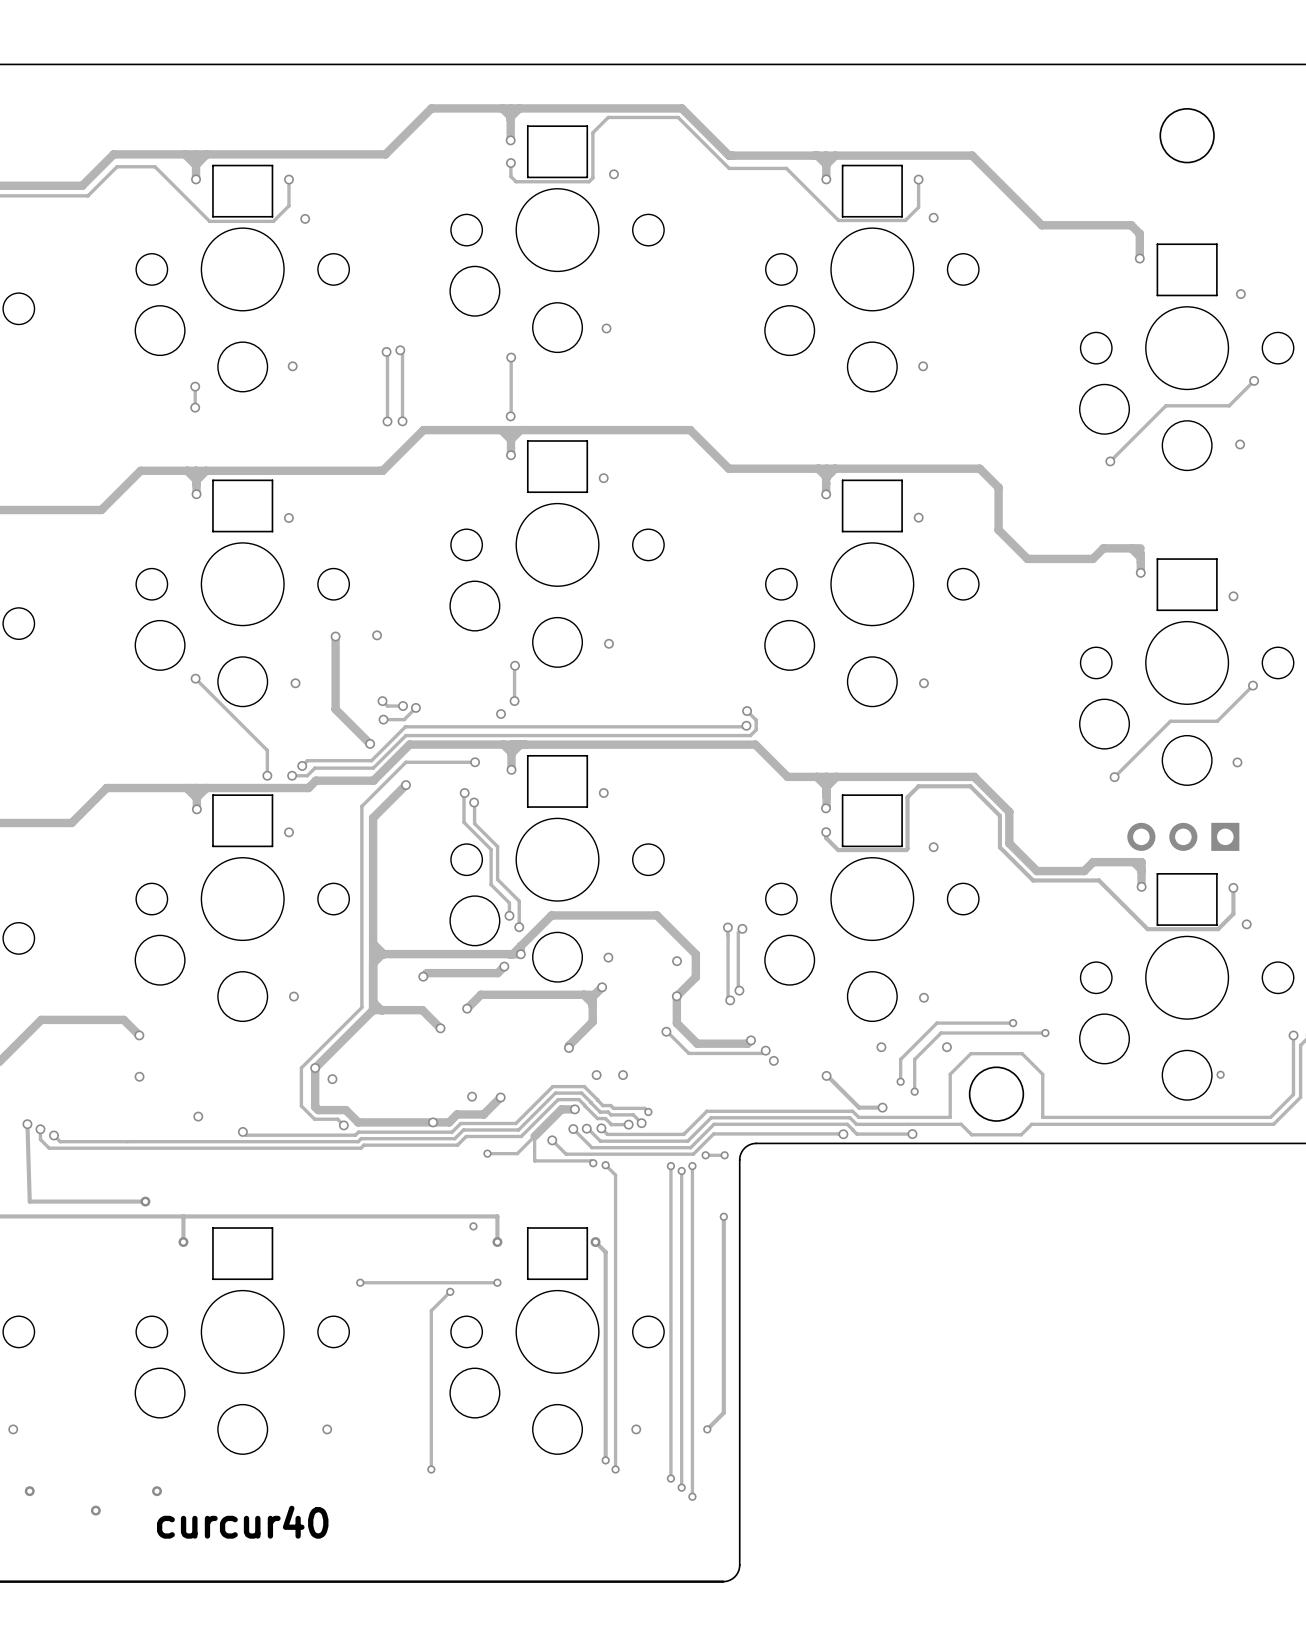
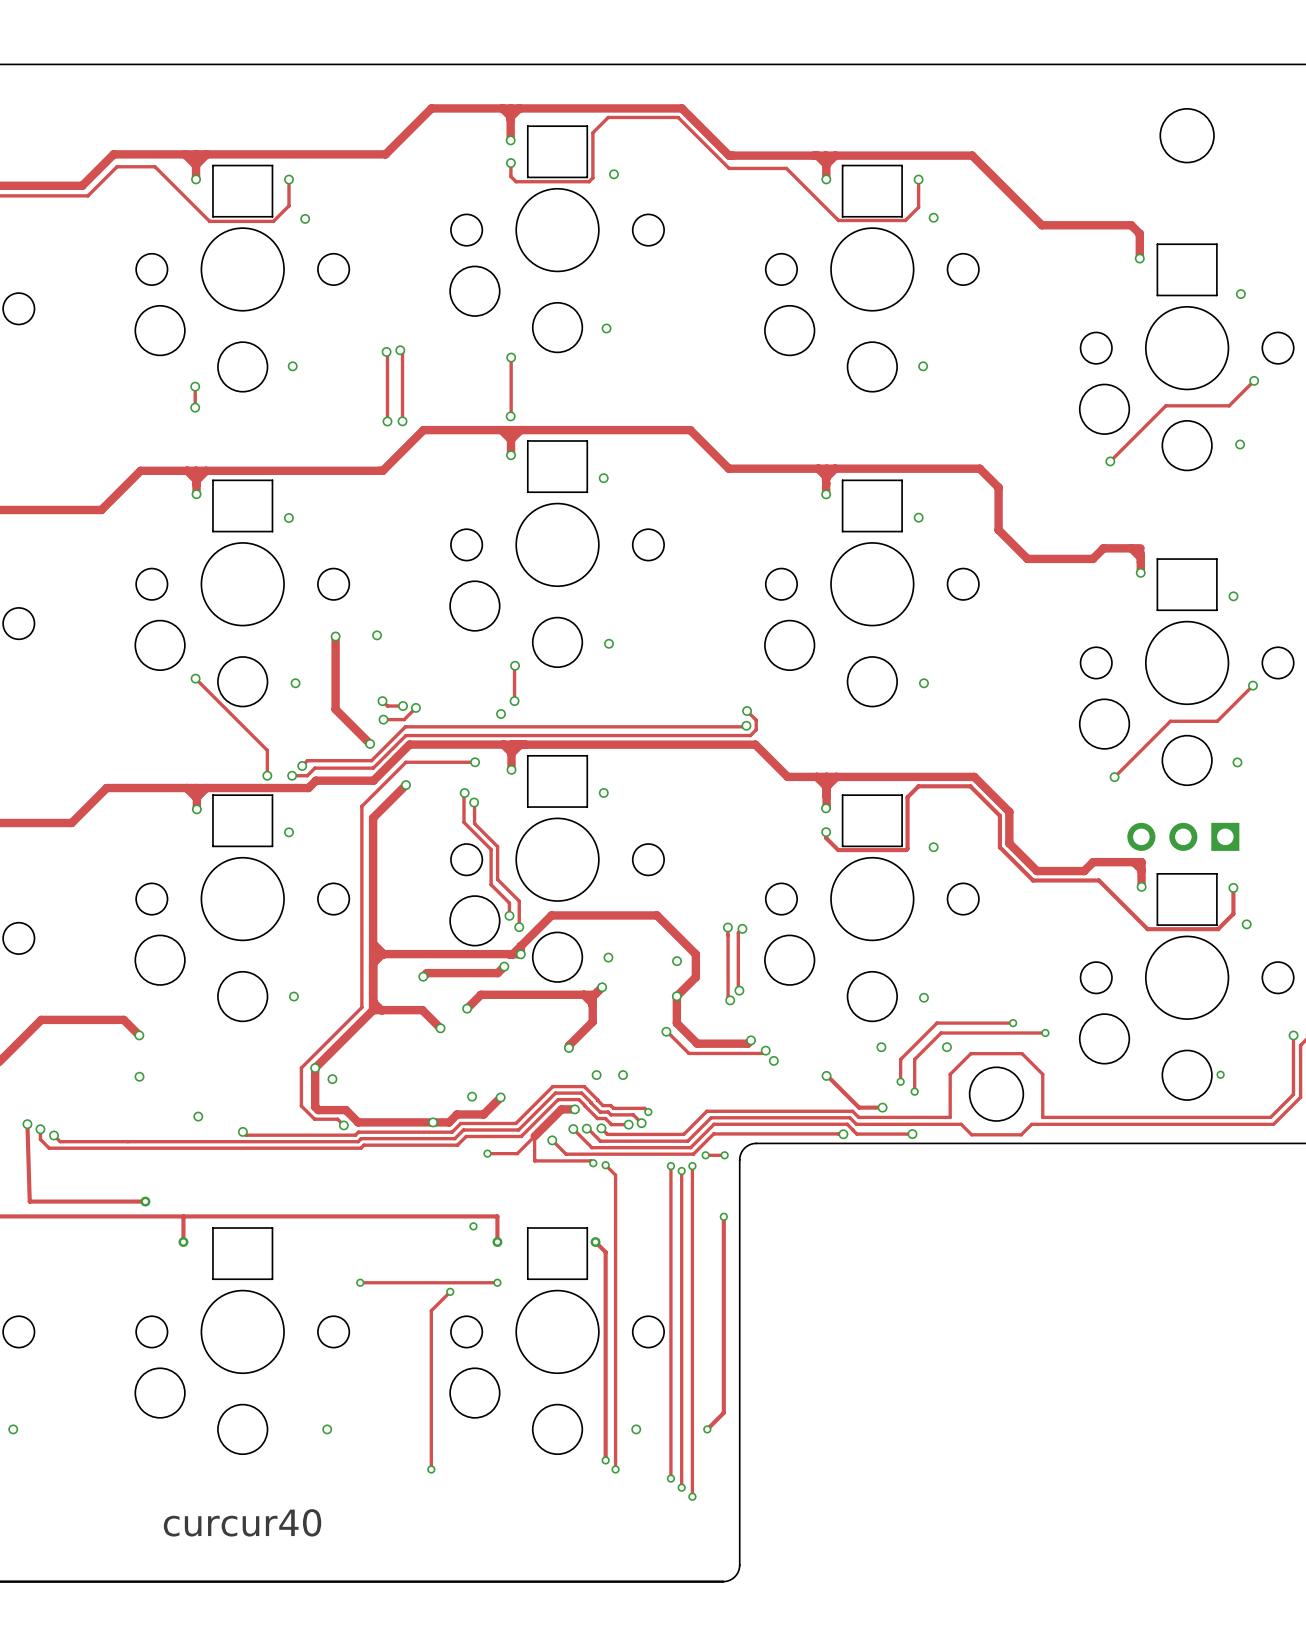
via: (29, 1491) -> none
via: (157, 1491) -> none
via: (95, 1510) -> none

